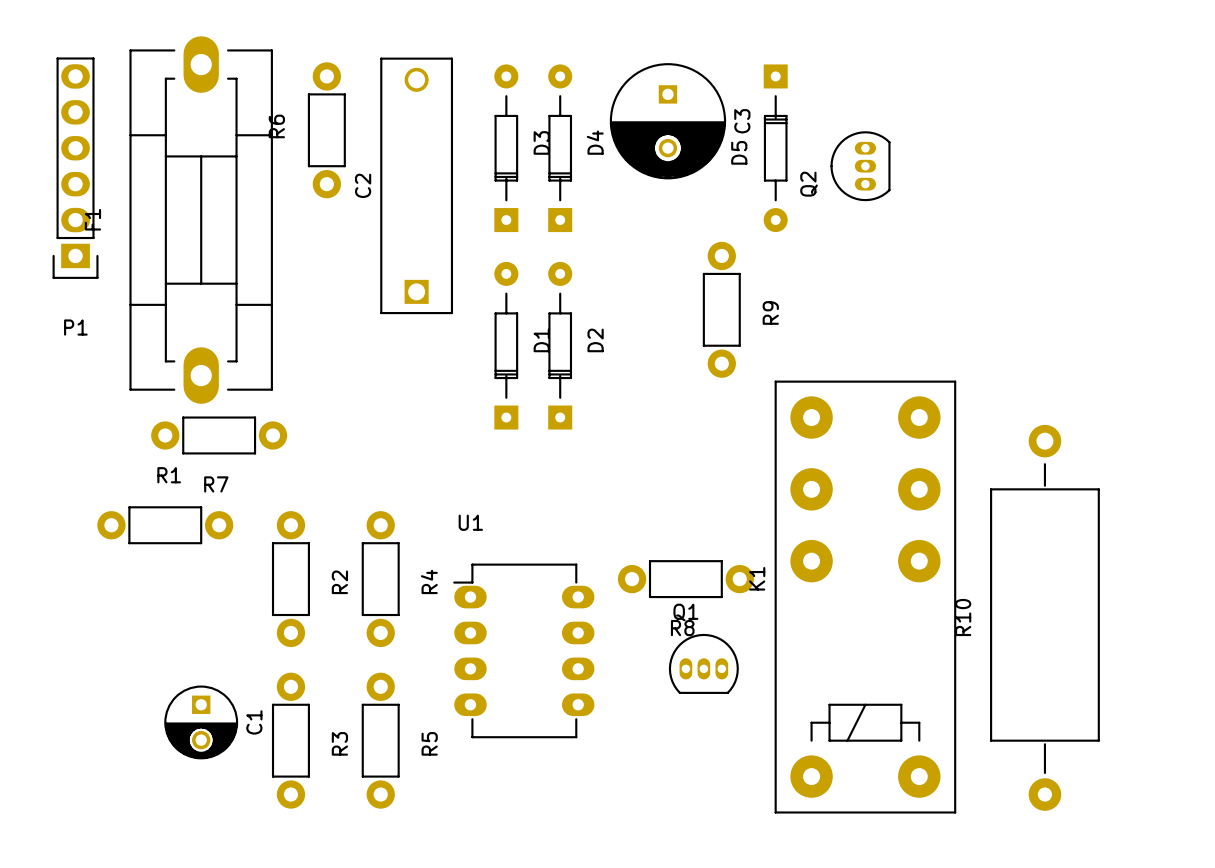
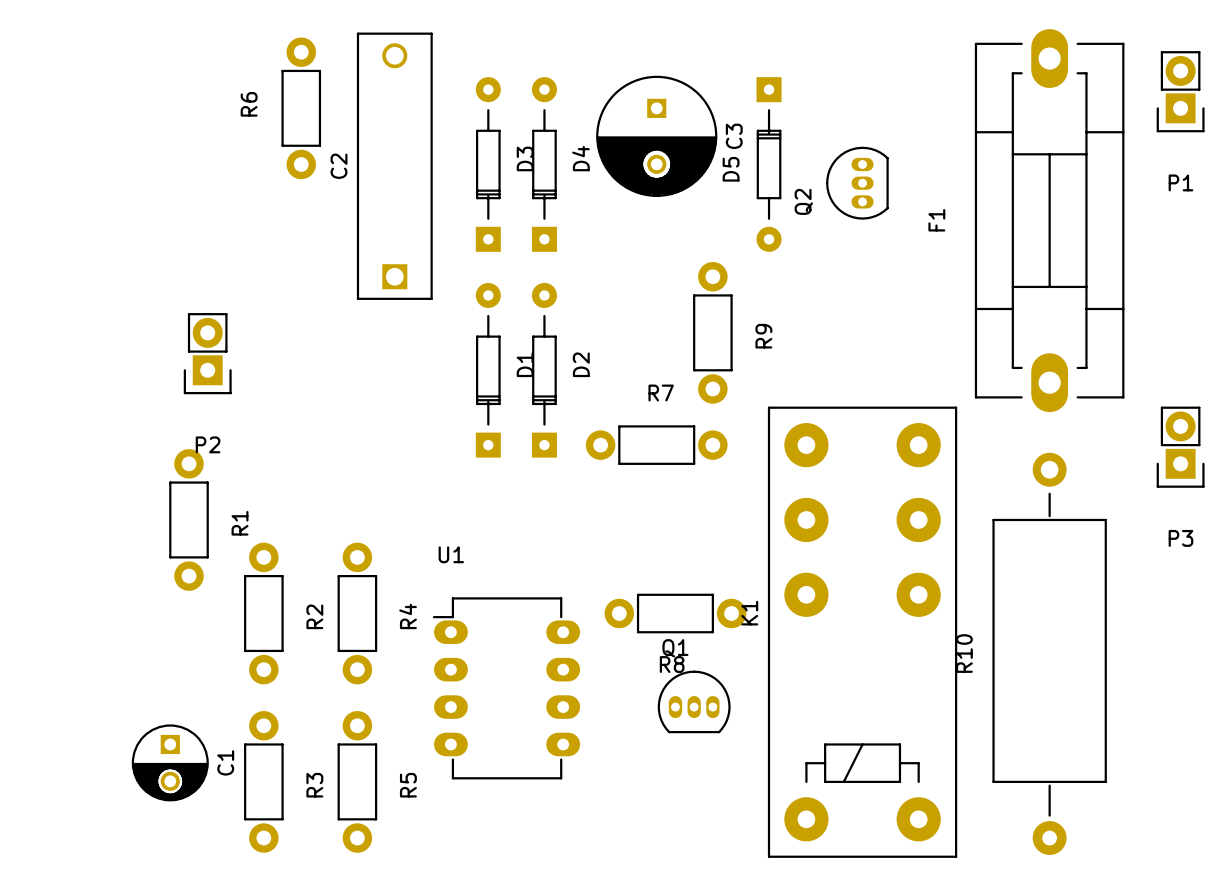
P1 footprint: [52, 57, 99, 279] -> [1156, 51, 1205, 133]
R6 position: (326, 130) -> (301, 108)
C2 position: (416, 185) -> (394, 166)
F1 position: (201, 220) -> (1049, 220)
P1 name position: P1 (75, 327) -> P1 (1180, 182)
P2: none -> (207, 353)
P3: none -> (1180, 447)
R7 position: (219, 435) -> (656, 445)
R7 name position: R7 (216, 484) -> R7 (661, 393)
R1 rotation: 0° (165, 525) -> 90° clockwise (189, 519)

